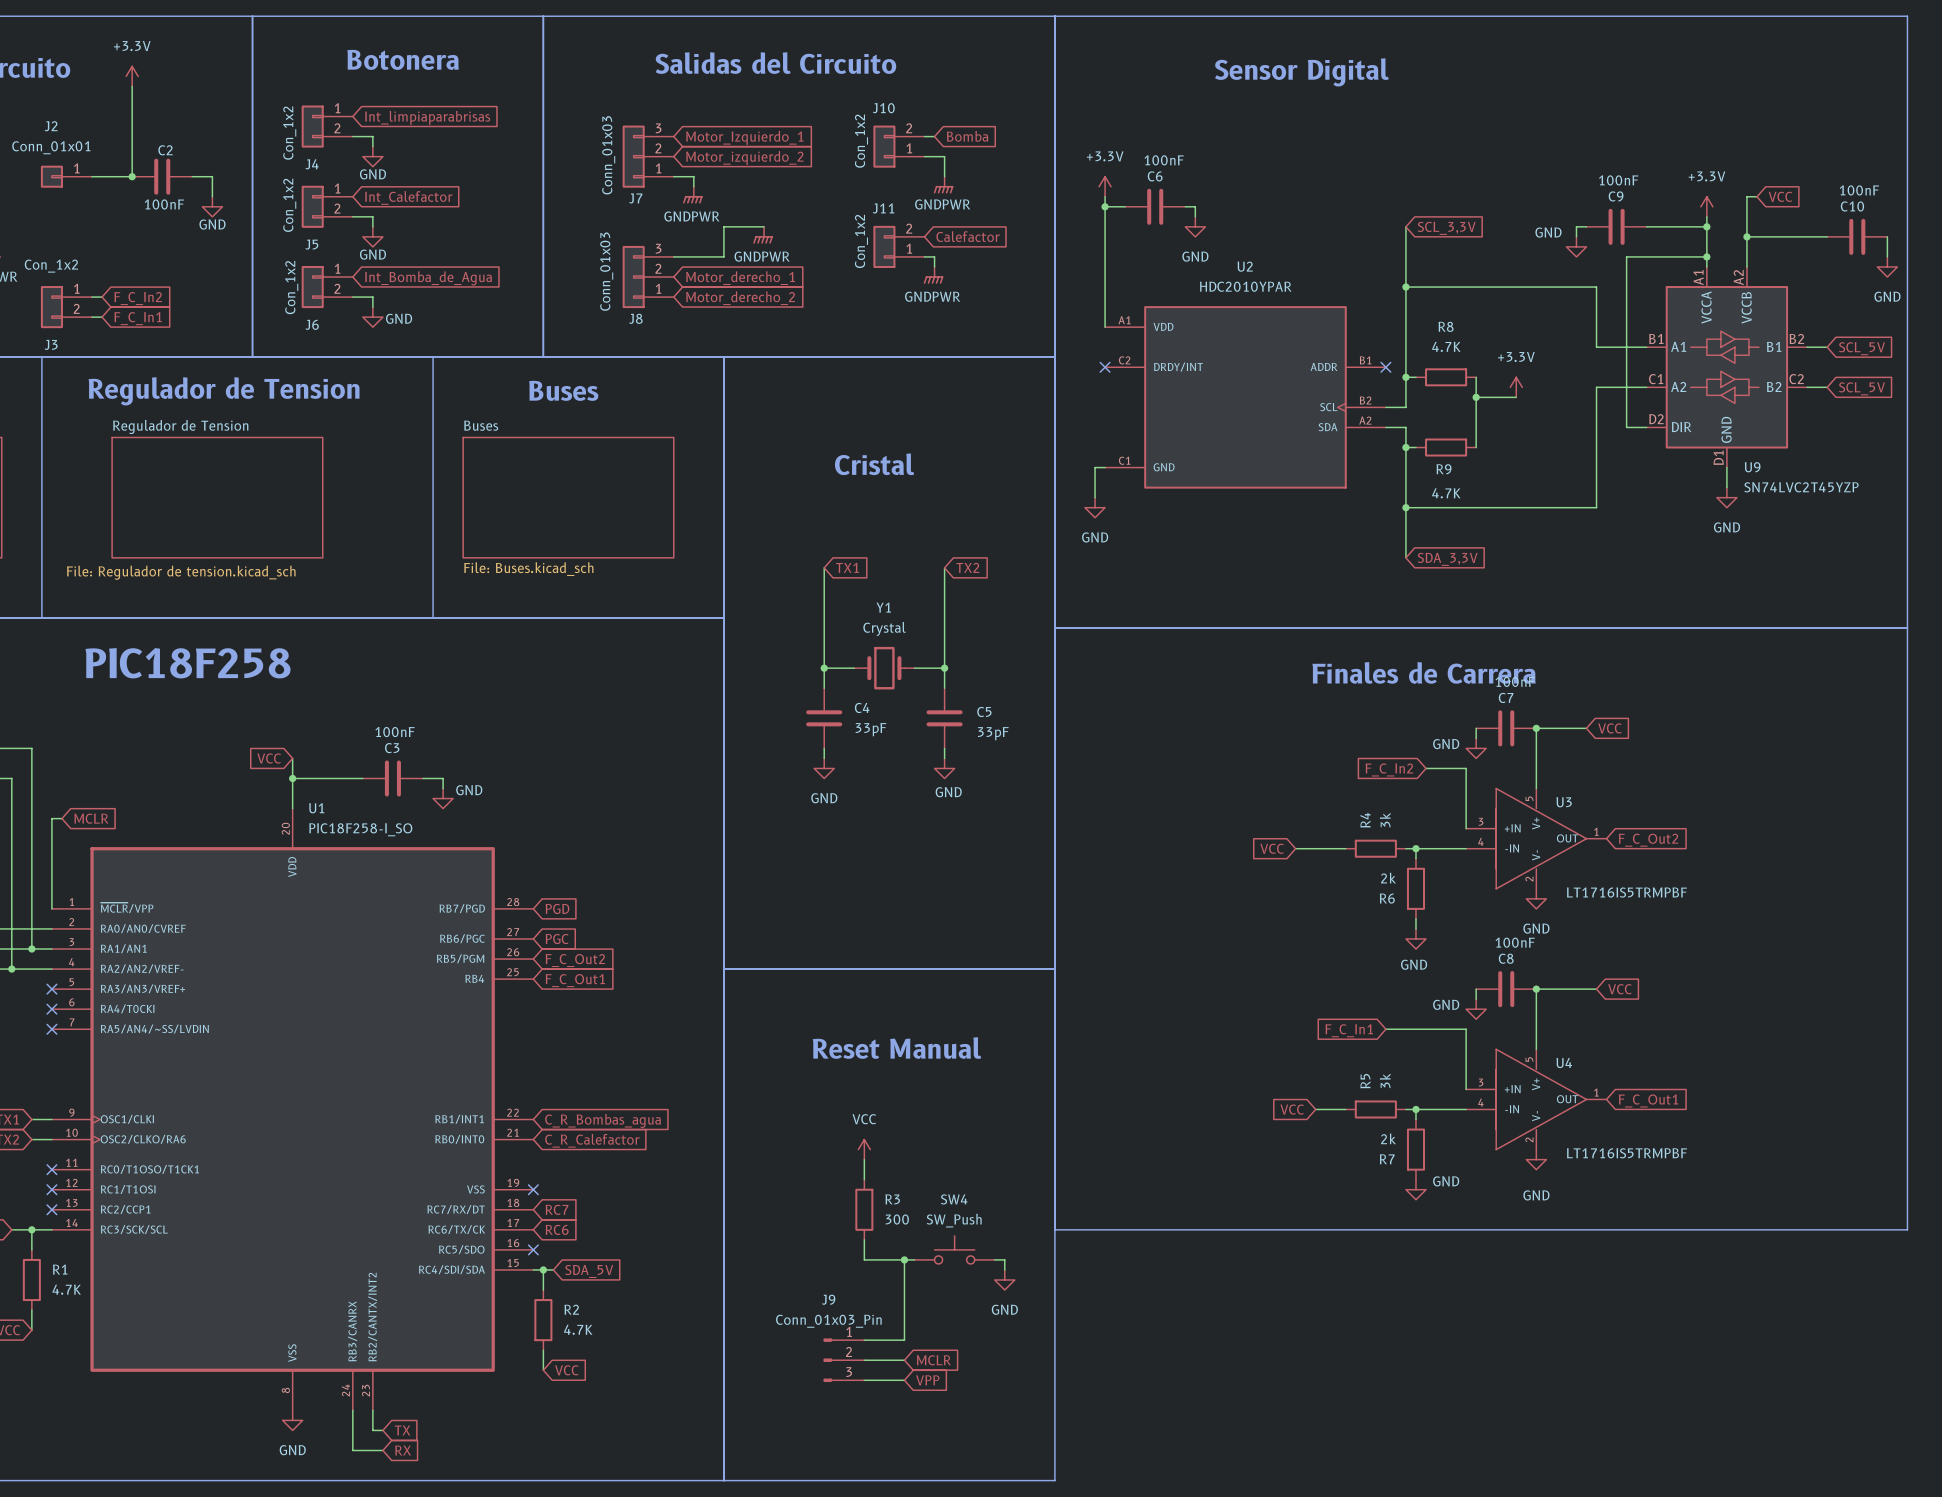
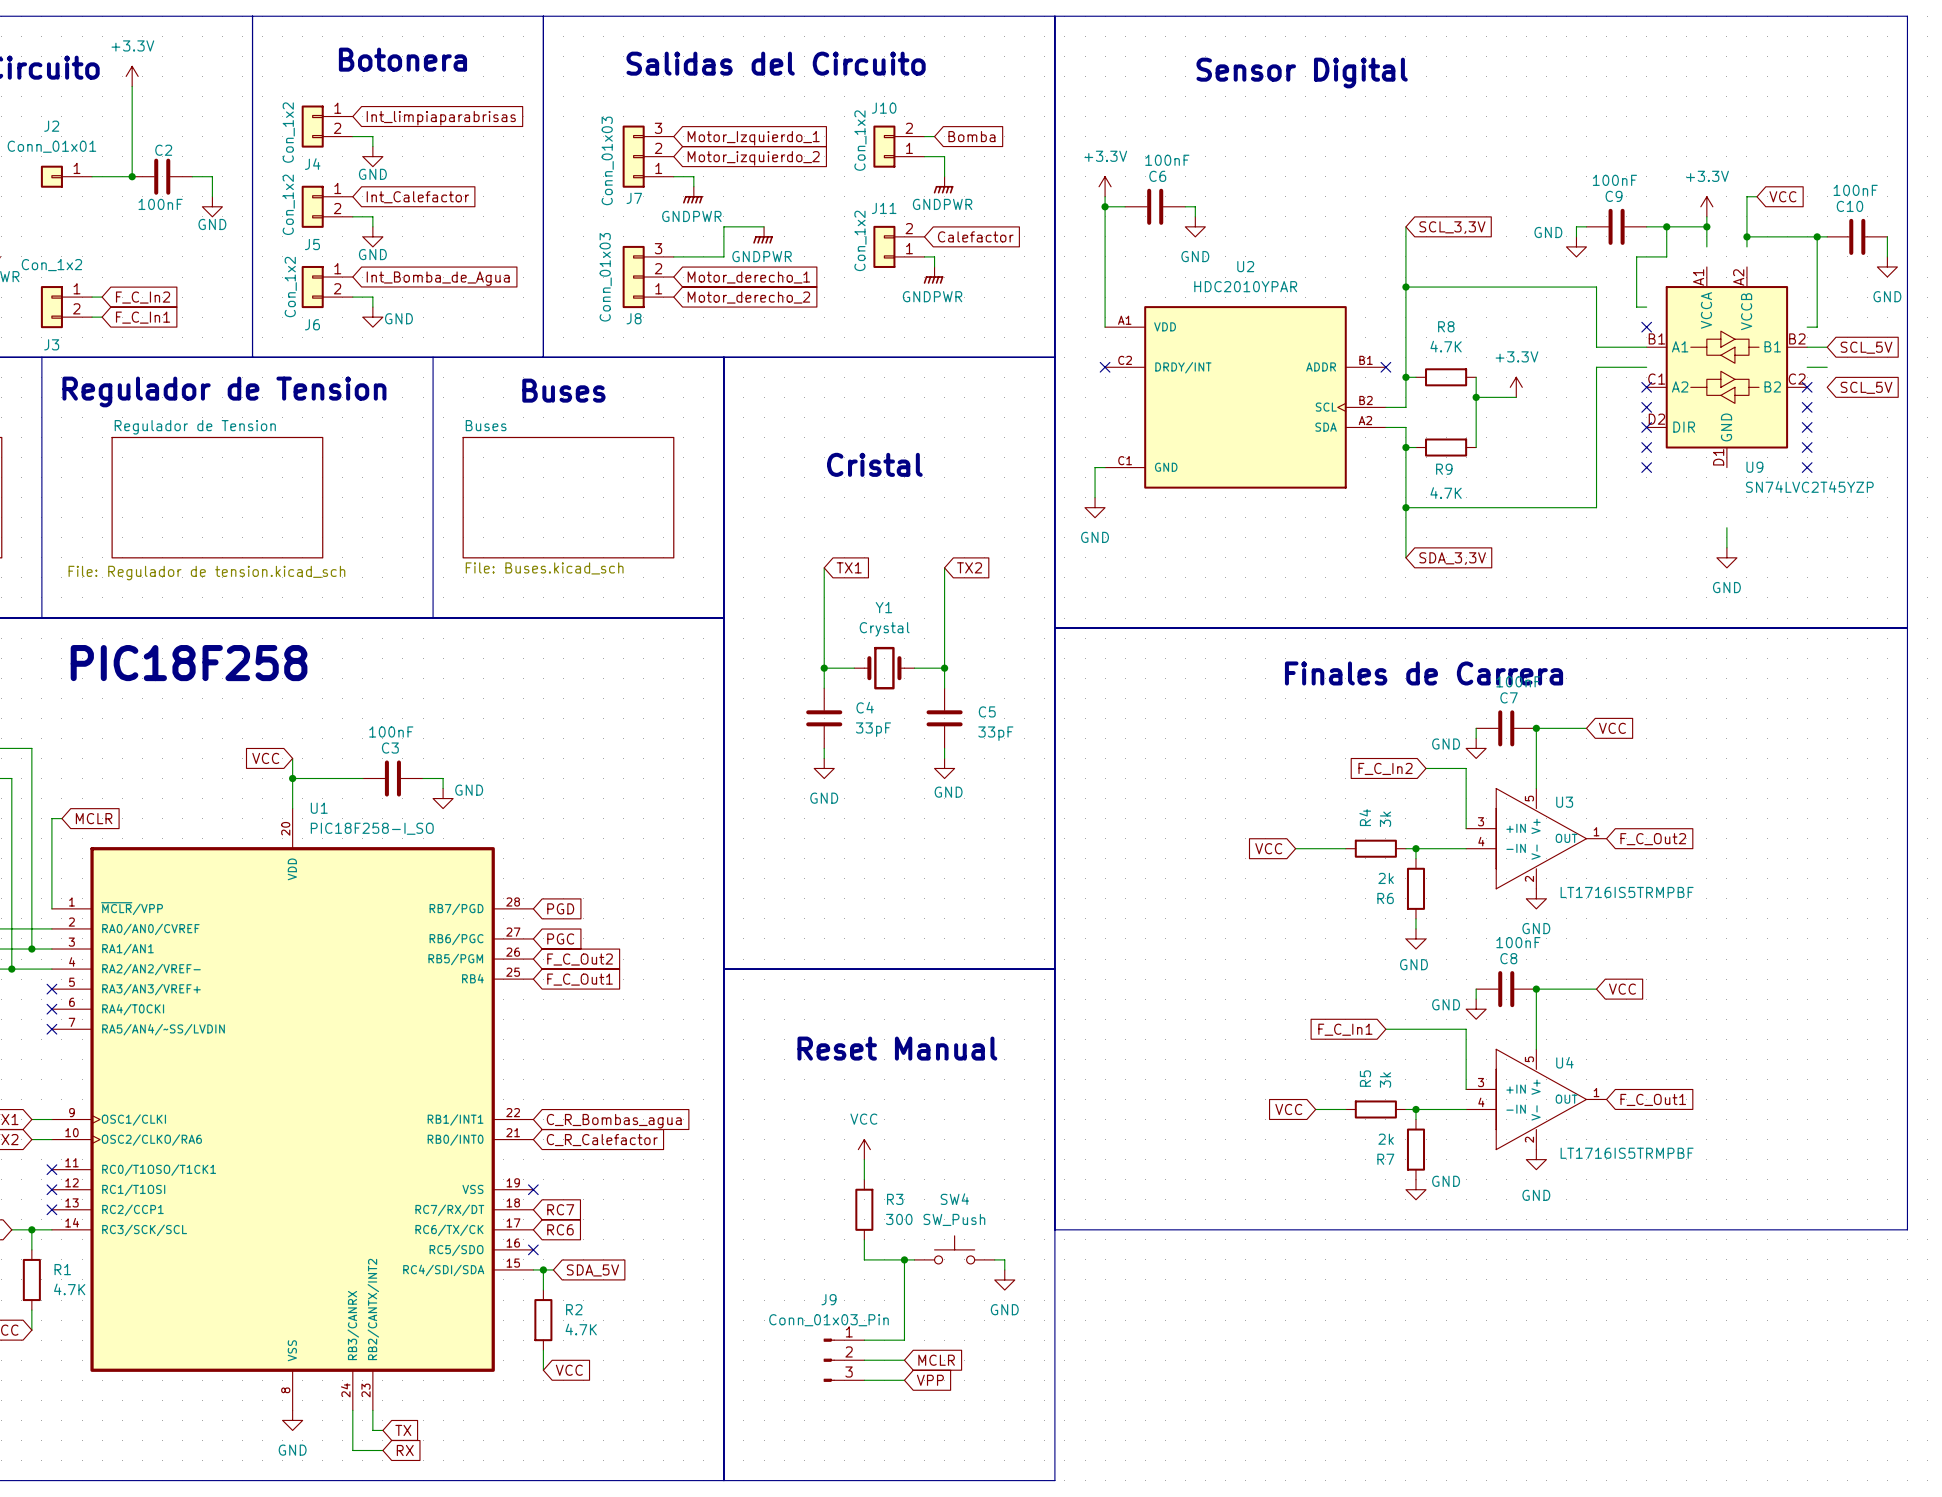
junction: none -> (1666, 226)
wire: none -> (1817, 236) (1817, 327) (1807, 327)
junction: none -> (1817, 236)
wire: (1706, 246) (1706, 266) -> none
wire: (1746, 246) (1746, 266) -> none
wire: (1636, 256) (1626, 256) (1626, 427) (1646, 427) -> (1636, 256) (1636, 307) (1646, 307)
wire: (1666, 256) (1706, 256) -> (1666, 256) (1666, 226)
junction: (1706, 256) -> none
no-connect mark: none -> (1646, 327)
wire: (1596, 387) (1646, 387) -> (1596, 387) (1596, 367) (1646, 367)
no-connect mark: none -> (1646, 387)
wire: (1807, 387) (1827, 387) -> (1807, 367) (1827, 367)
no-connect mark: none -> (1807, 387)
no-connect mark: none -> (1646, 407)
no-connect mark: none -> (1807, 407)
no-connect mark: none -> (1646, 427)
no-connect mark: none -> (1807, 427)
no-connect mark: none -> (1646, 447)
no-connect mark: none -> (1807, 447)
no-connect mark: none -> (1646, 467)
wire: (1726, 467) (1726, 487) -> (1726, 527) (1726, 547)
no-connect mark: none -> (1807, 467)
power symbol position: GND (1726, 497) -> GND (1726, 557)

